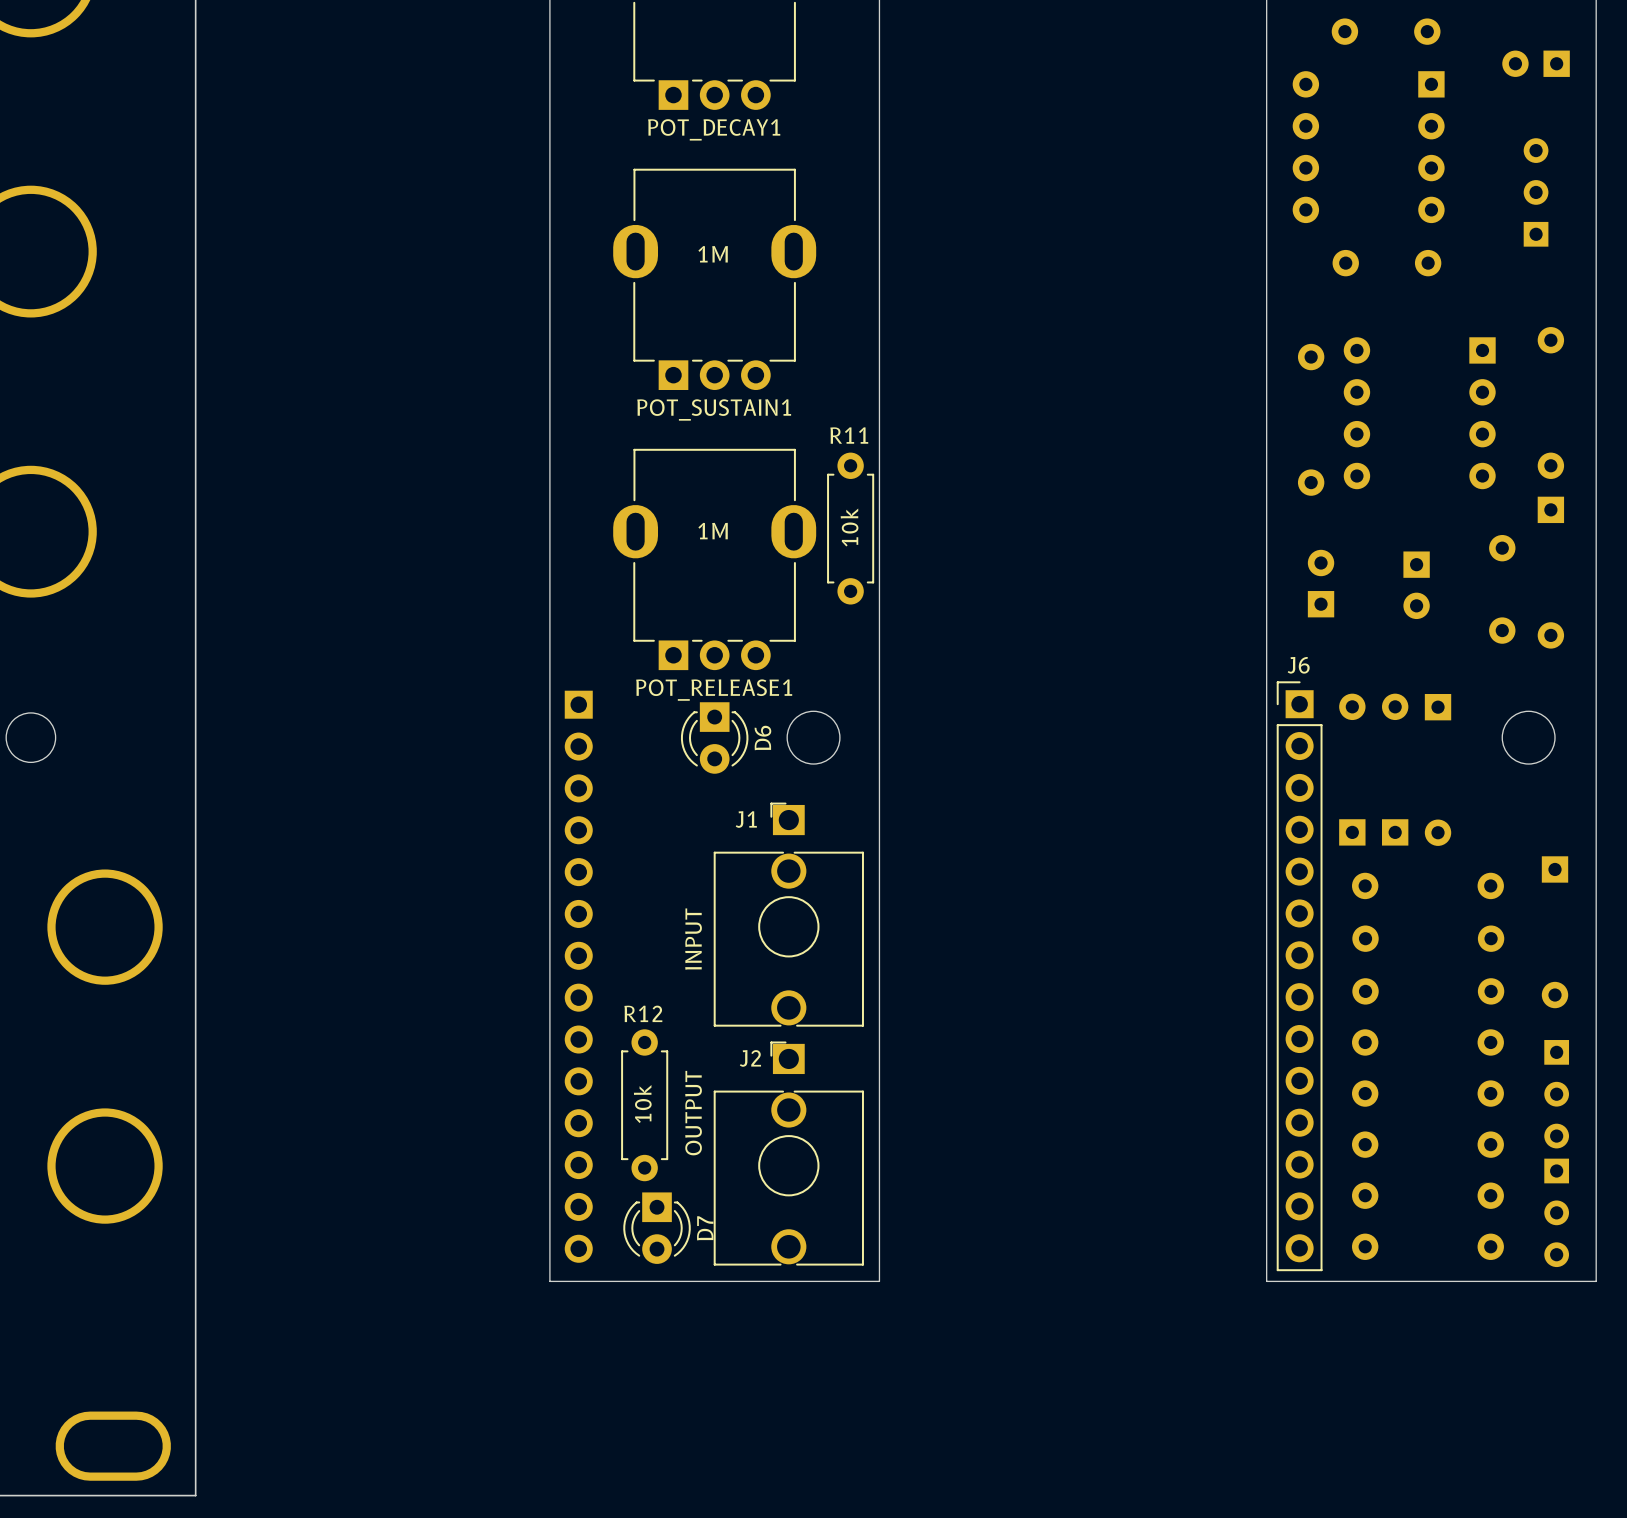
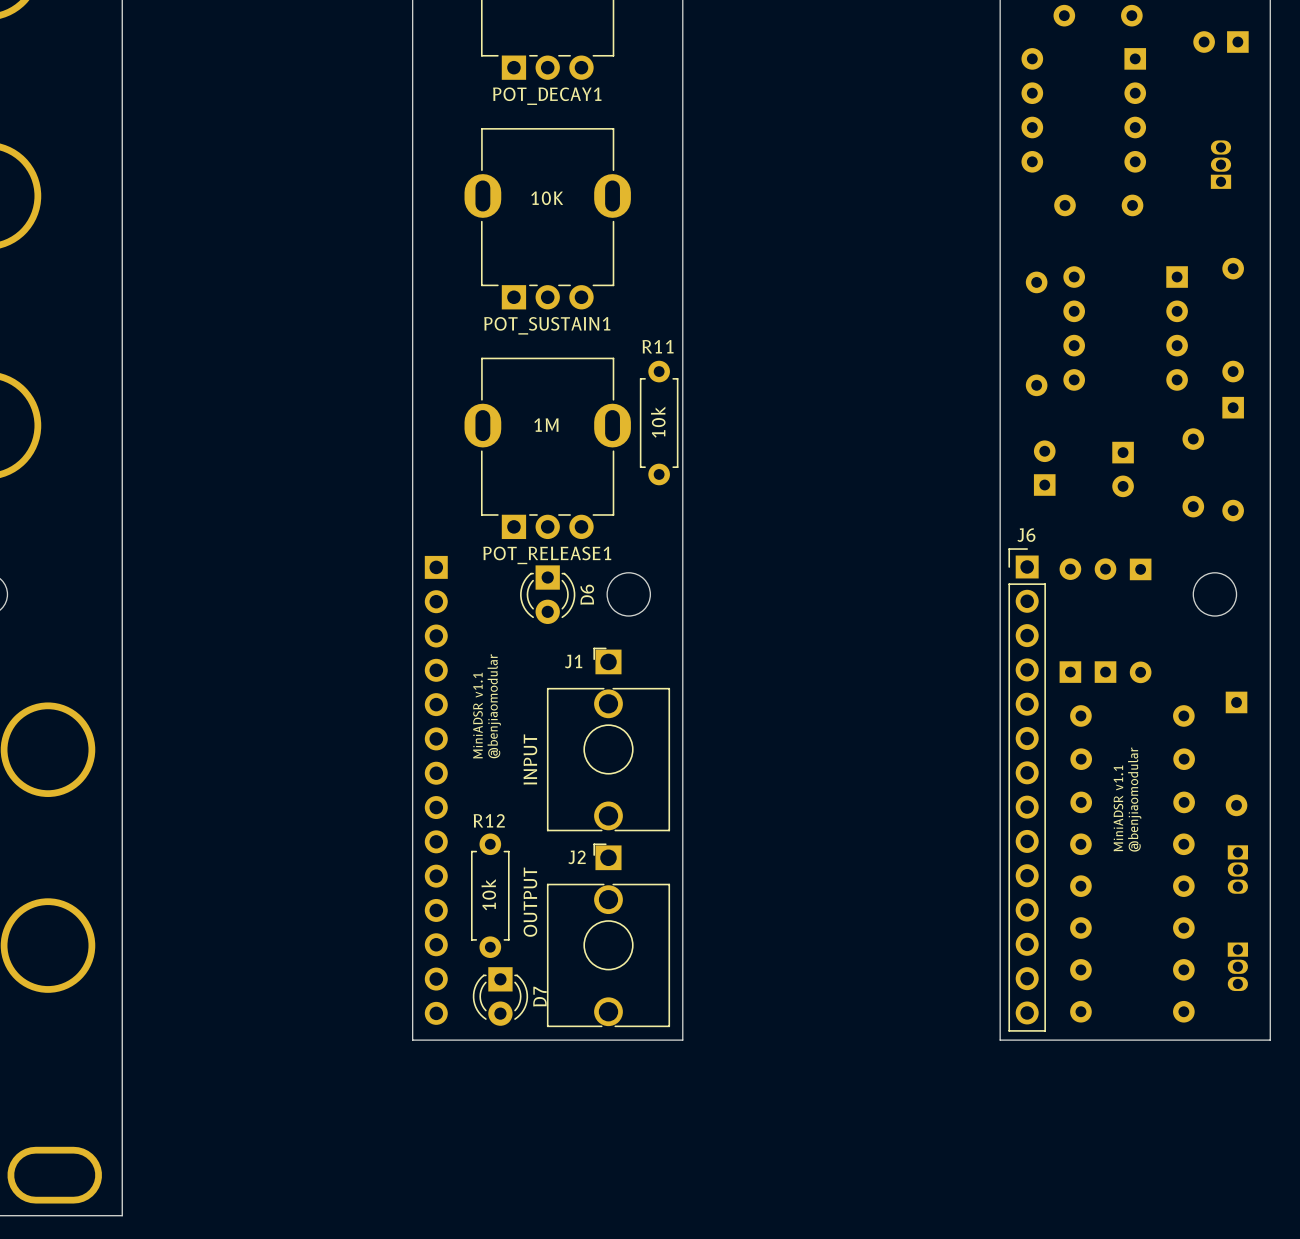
part: (1536, 192) -> none
part: none -> (1220, 164)
POT_SUSTAIN1 text: 1M (713, 254) -> 10K (547, 198)
text: none -> @benjiaomodular (494, 706)
text: none -> MiniADSR v1.1 (478, 715)
text: none -> @benjiaomodular (1134, 799)
text: none -> MiniADSR v1.1 (1118, 808)
part: none -> (1237, 869)
part: (1556, 1094) -> none
part: none -> (1237, 966)
part: (1556, 1212) -> none

